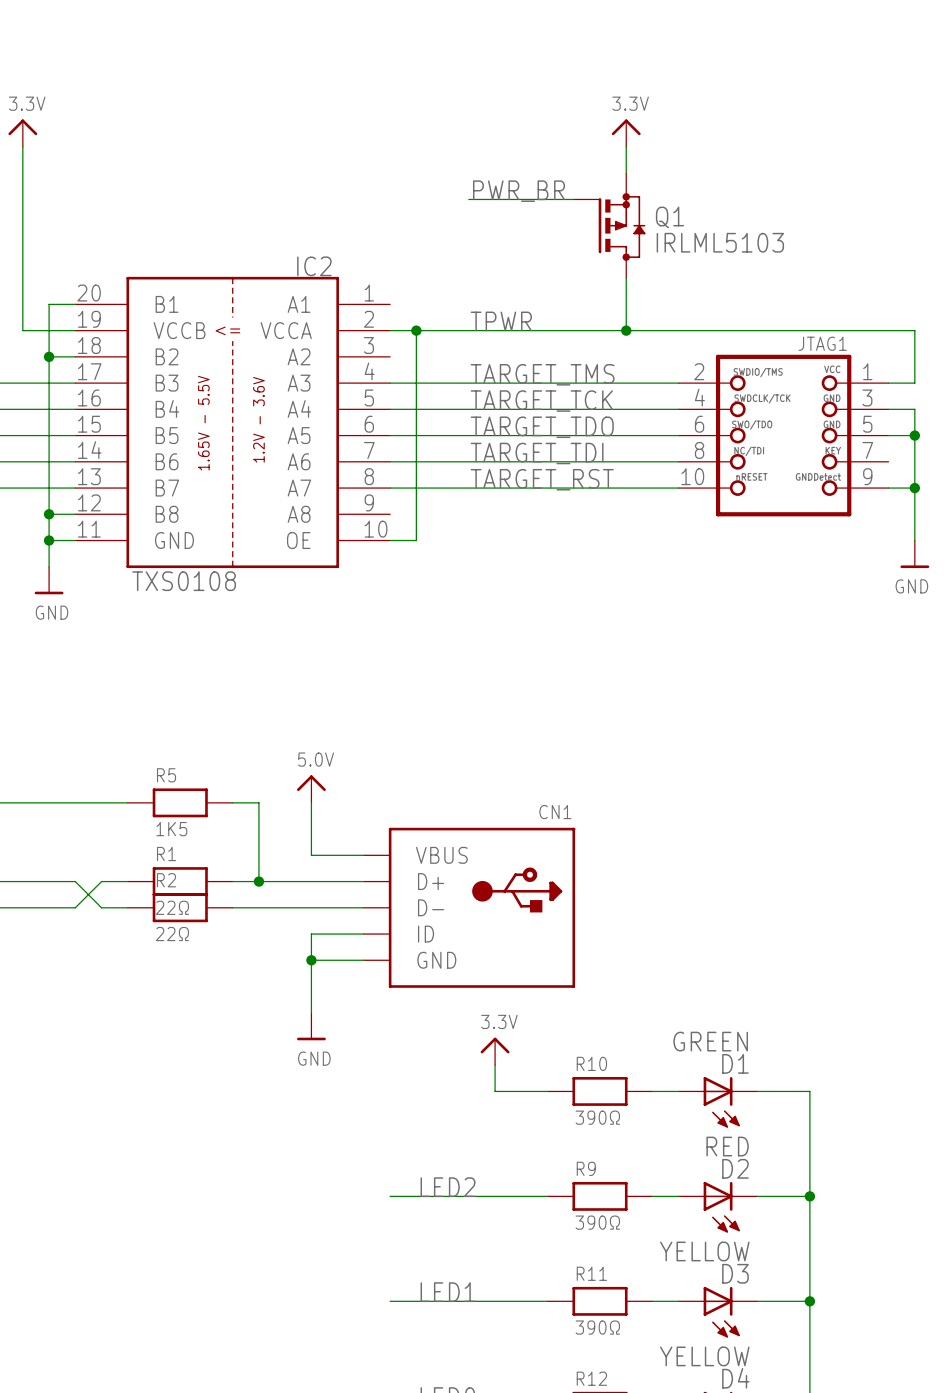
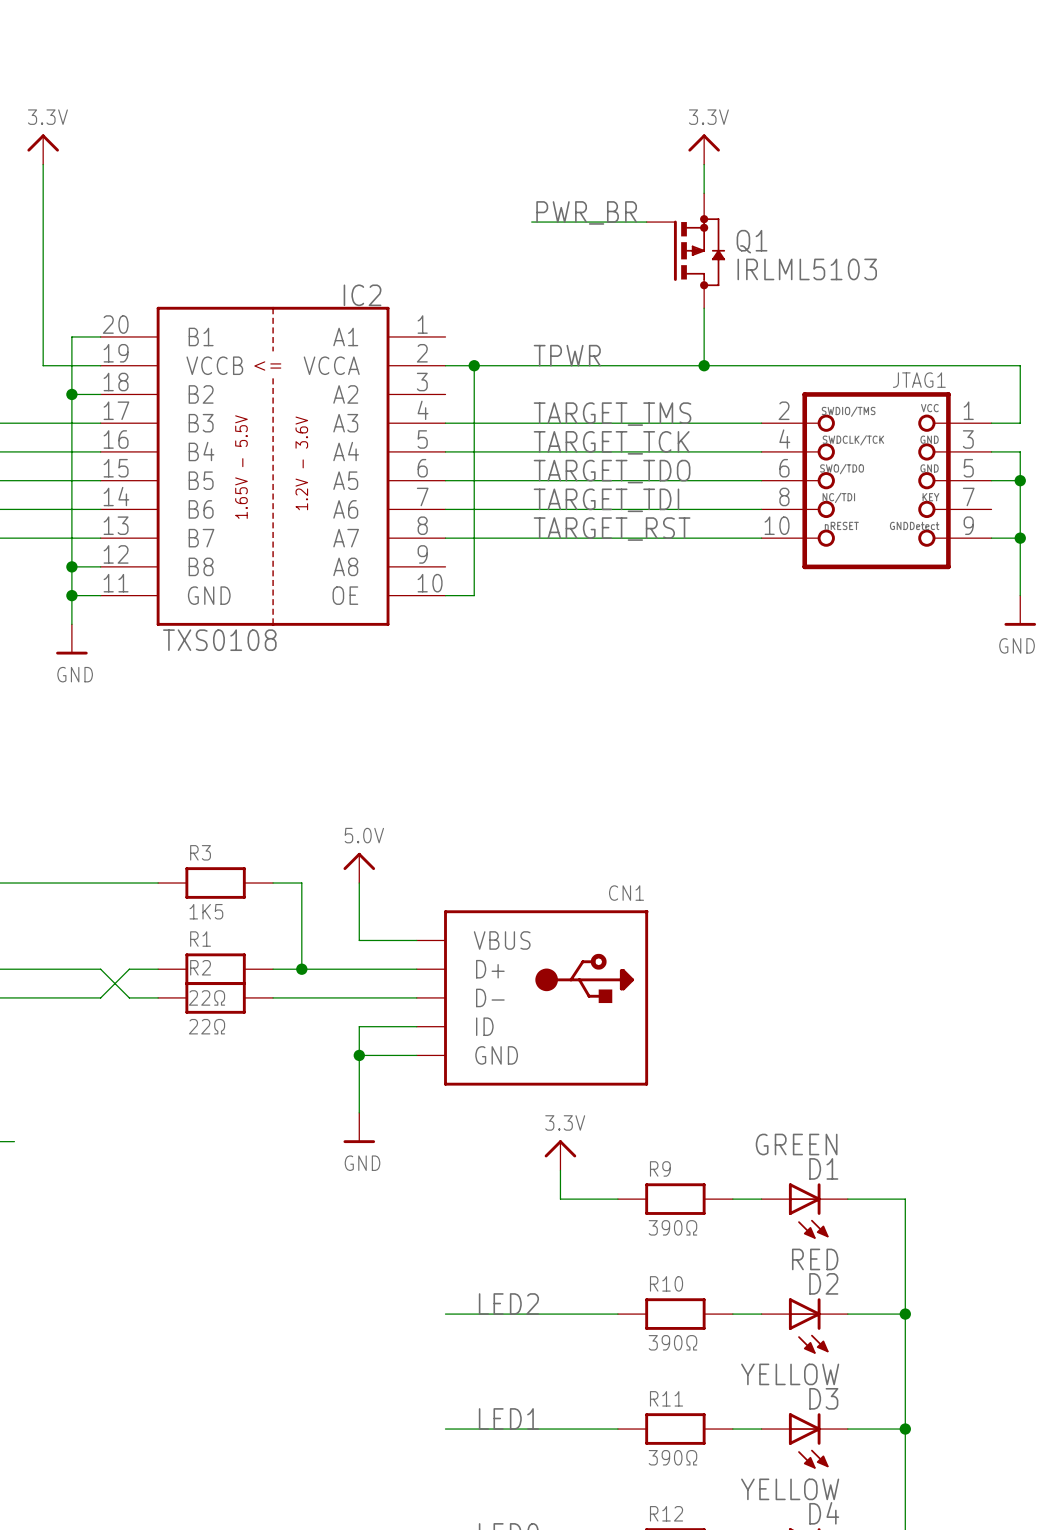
R5 name: R5 (166, 775) -> R3 (200, 852)
R10 name: R10 (591, 1063) -> R9 (660, 1168)
R9 name: R9 (586, 1168) -> R10 (666, 1283)

